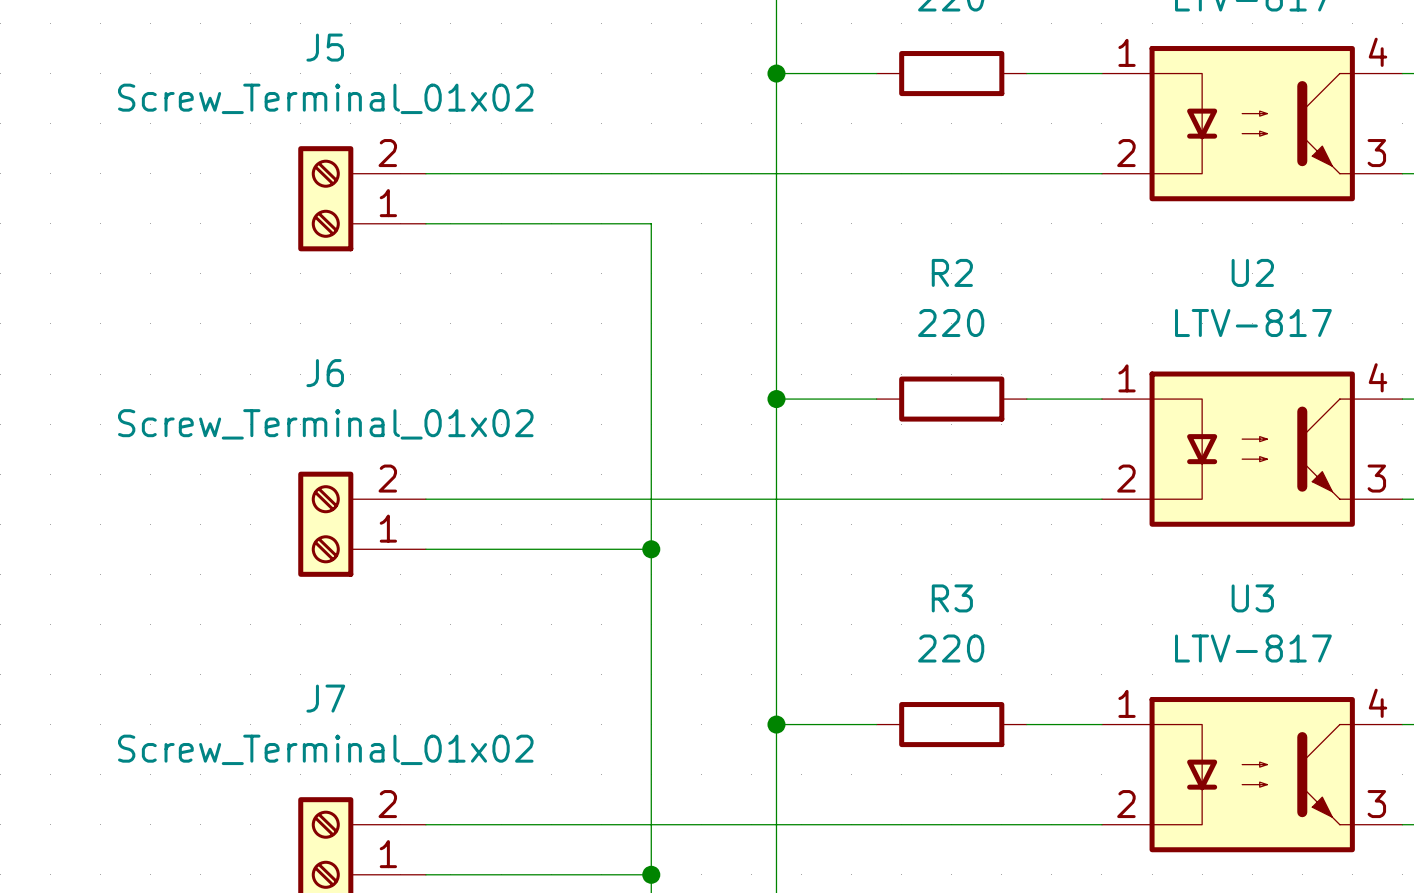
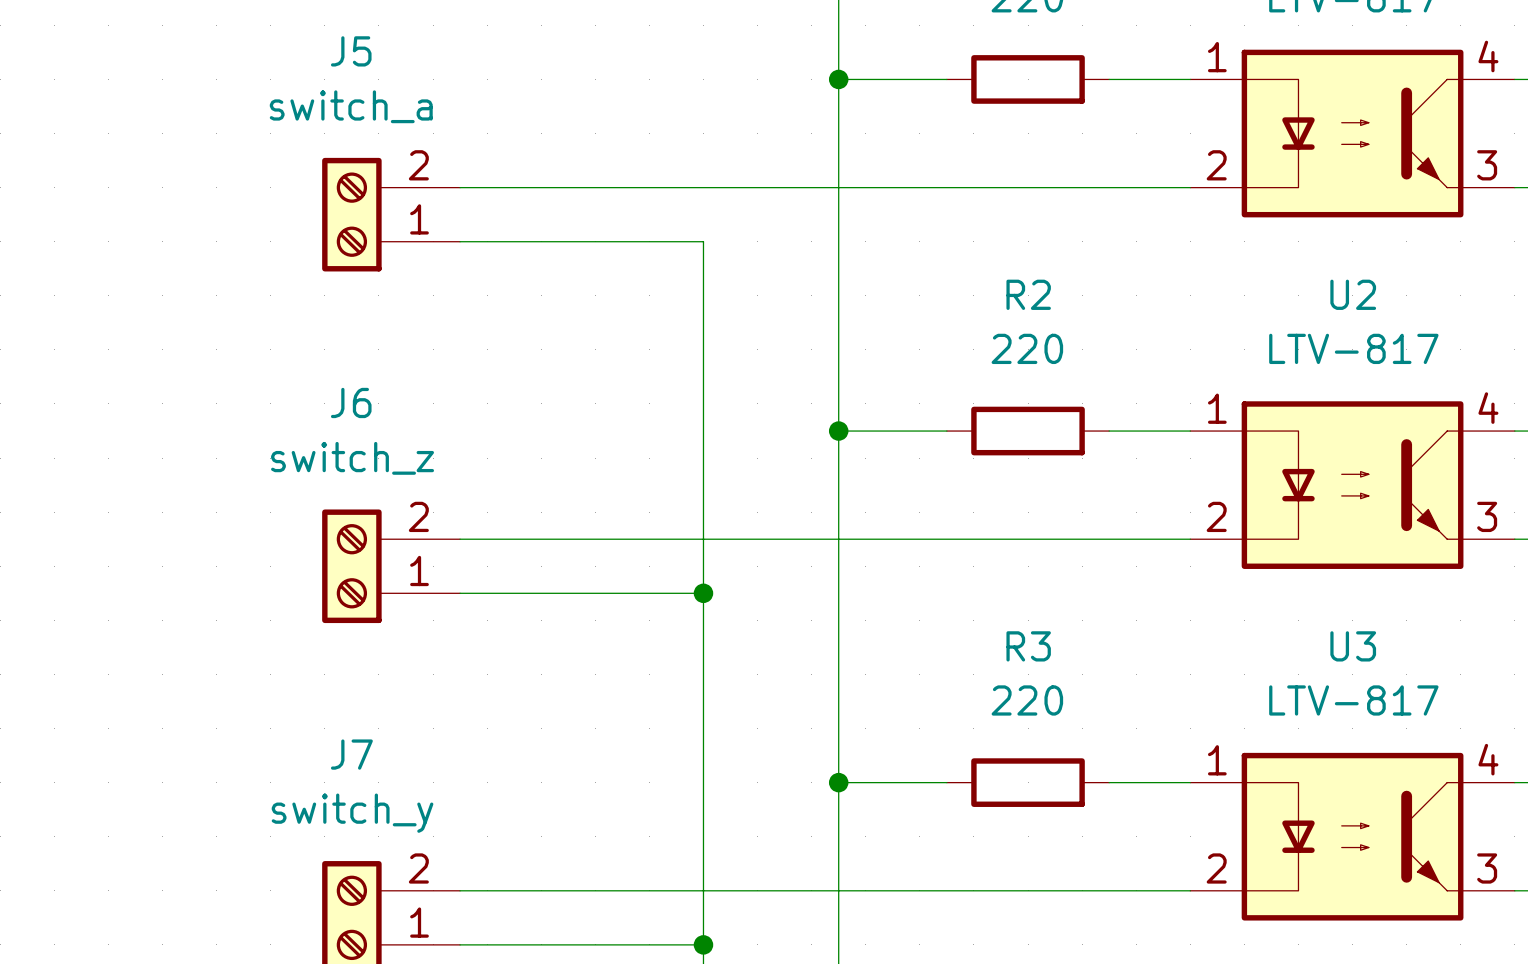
J5 value: Screw_Terminal_01x02 (325, 98) -> switch_a (351, 106)
J6 value: Screw_Terminal_01x02 (325, 424) -> switch_z (352, 458)
J7 value: Screw_Terminal_01x02 (325, 749) -> switch_y (352, 813)

